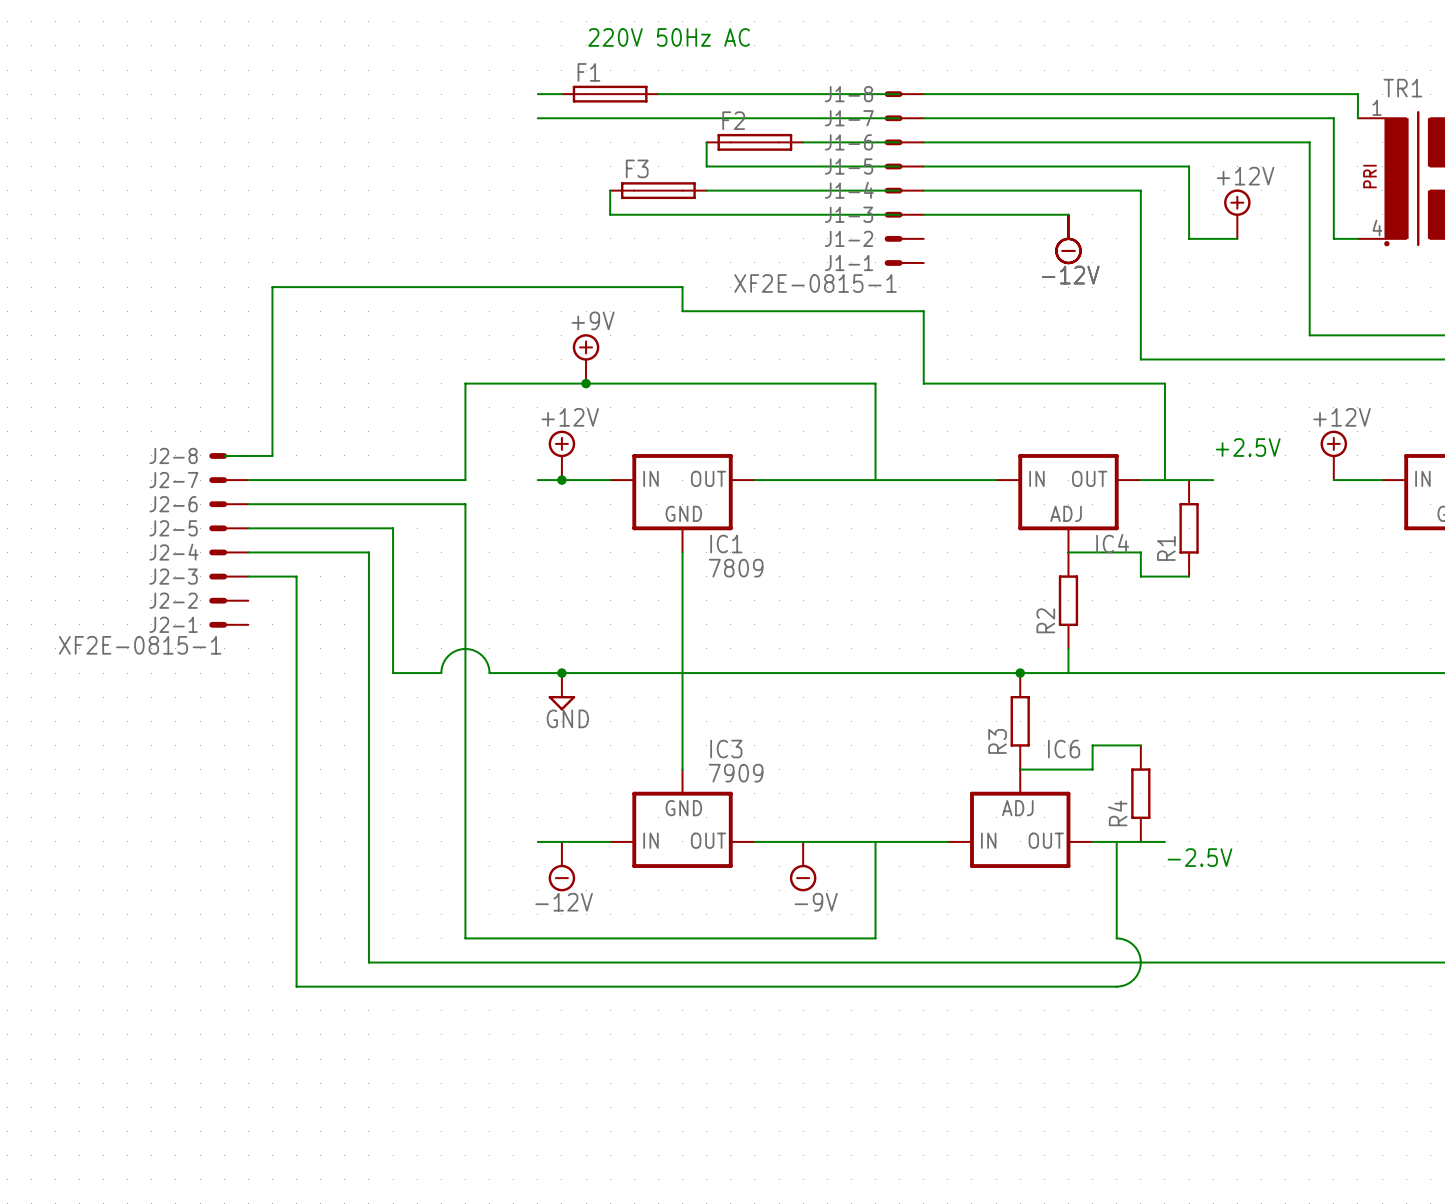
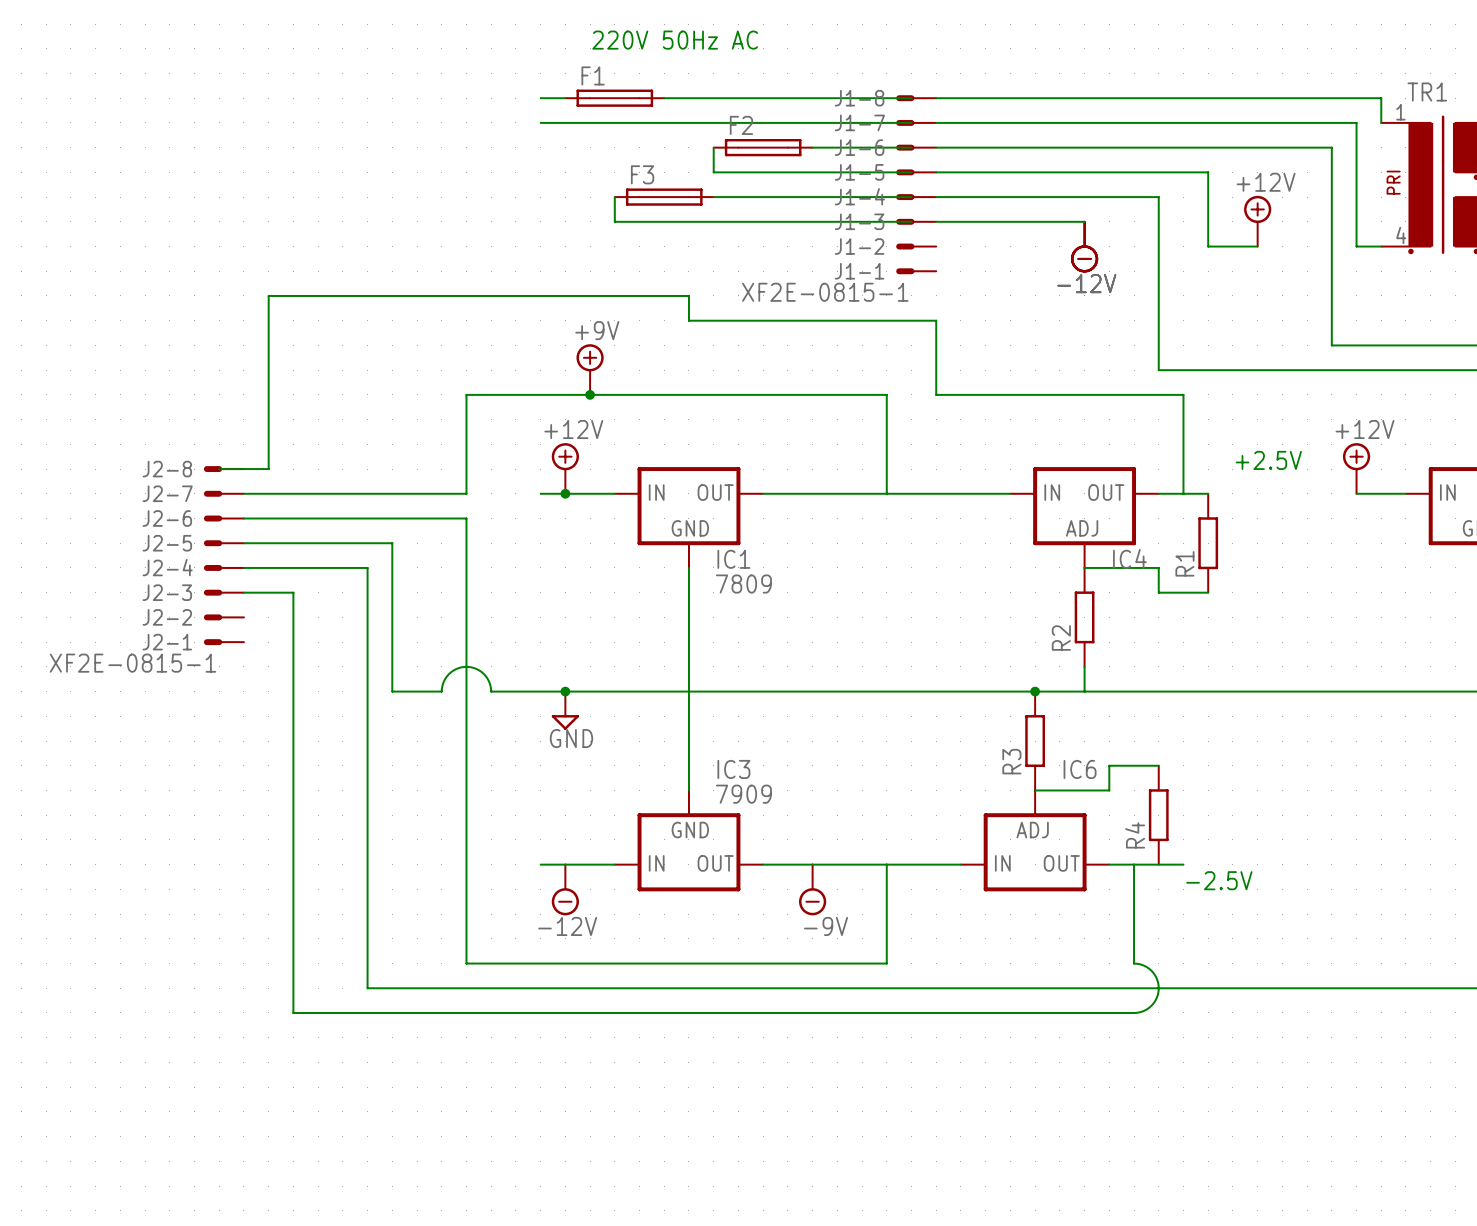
wire: (1189, 480) (1213, 480) -> none

